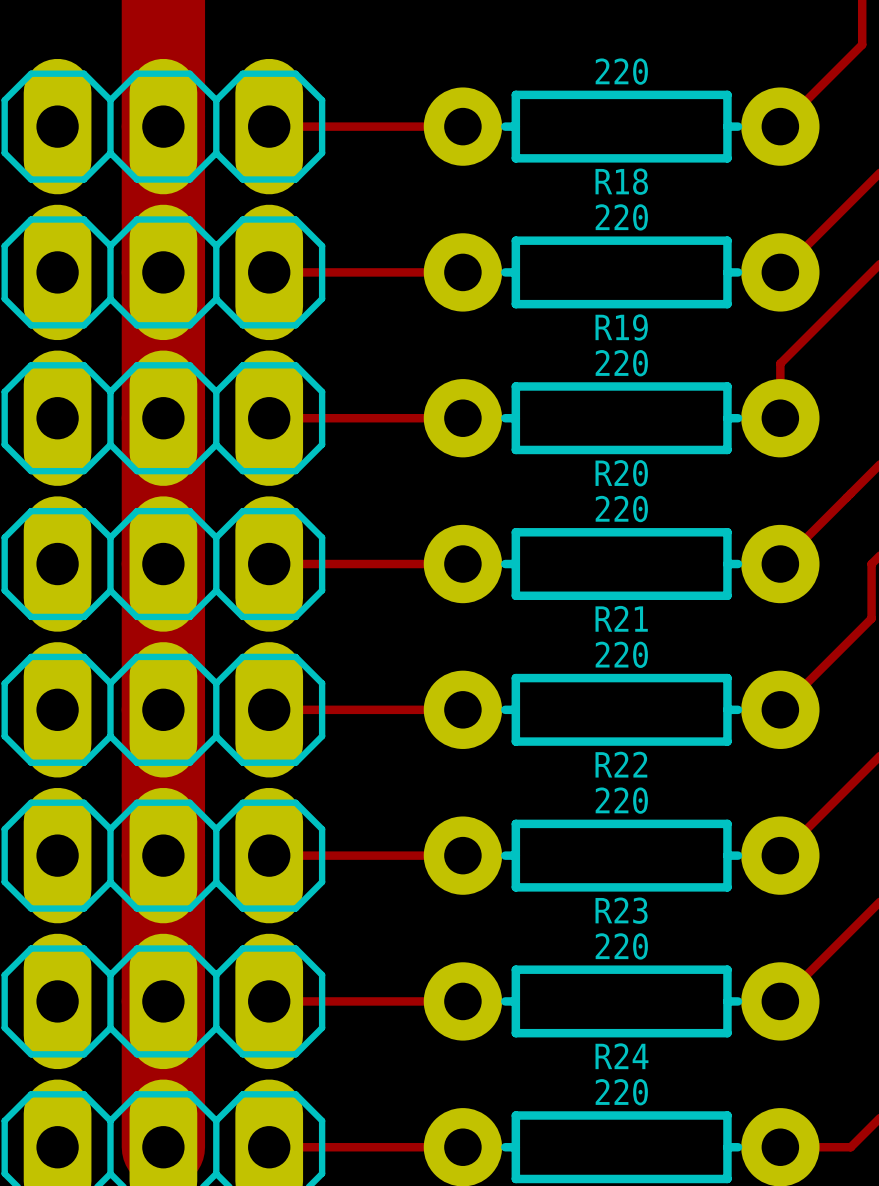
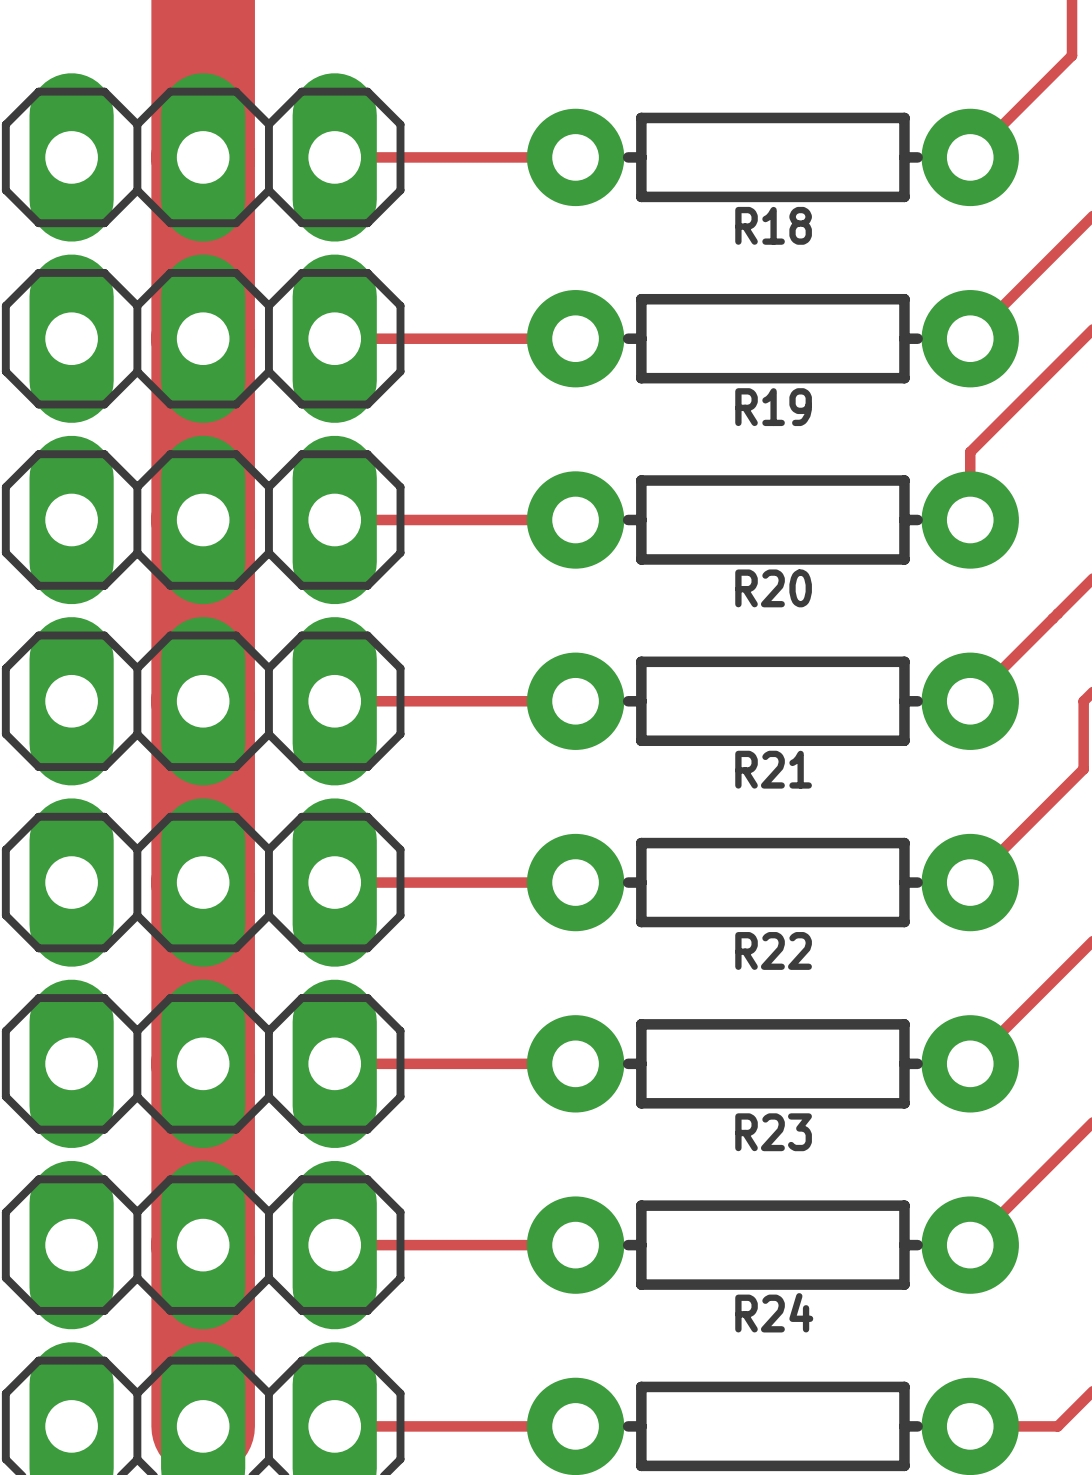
R18 value: 220 (621, 71) -> none
R19 value: 220 (621, 217) -> none
R20 value: 220 (621, 363) -> none
R21 value: 220 (621, 509) -> none
R22 value: 220 (621, 654) -> none
R23 value: 220 (621, 800) -> none
R24 value: 220 (621, 946) -> none
part value: 220 (621, 1092) -> none

